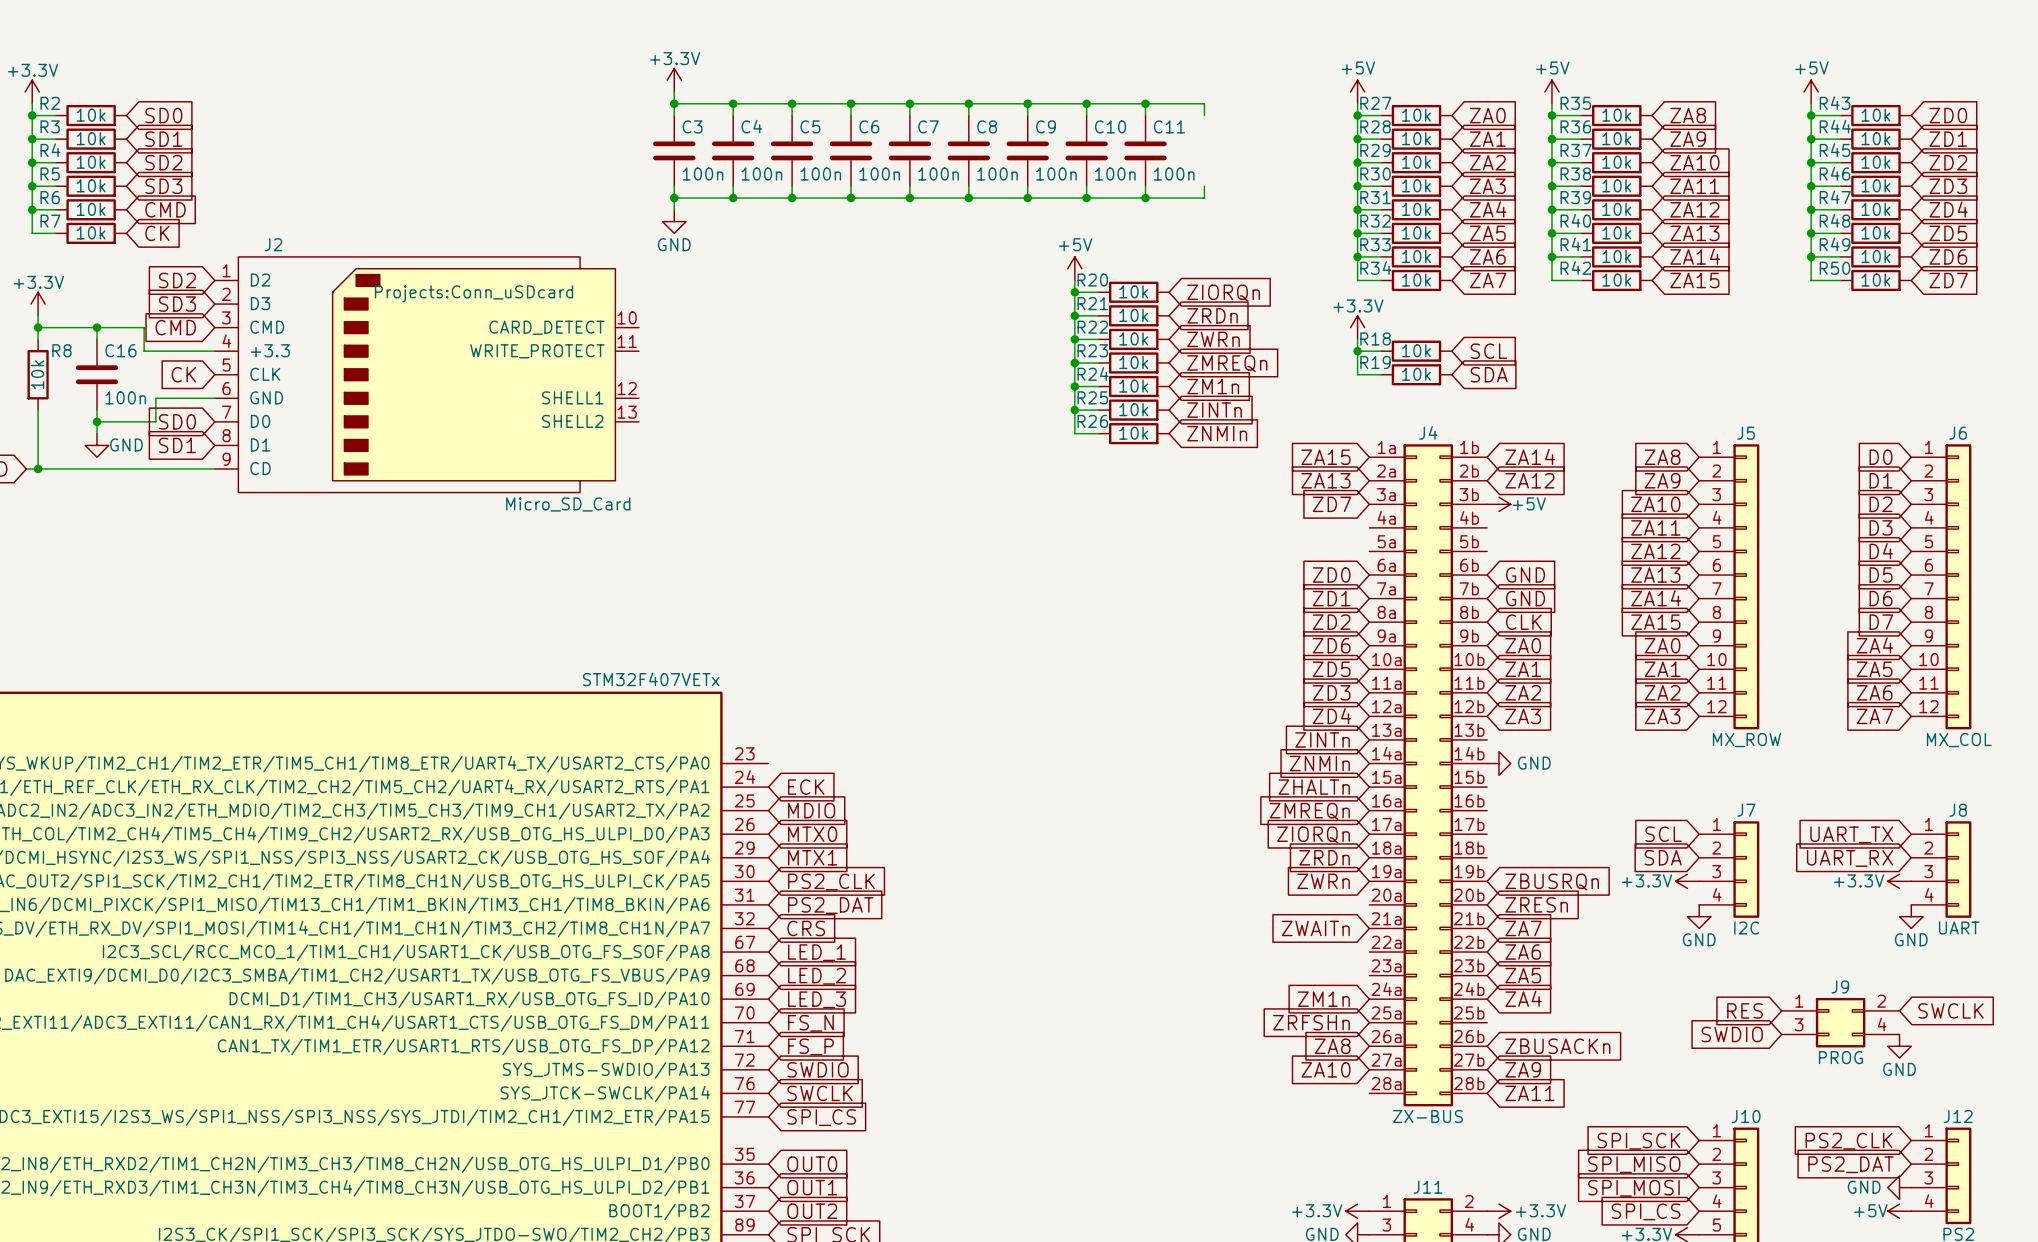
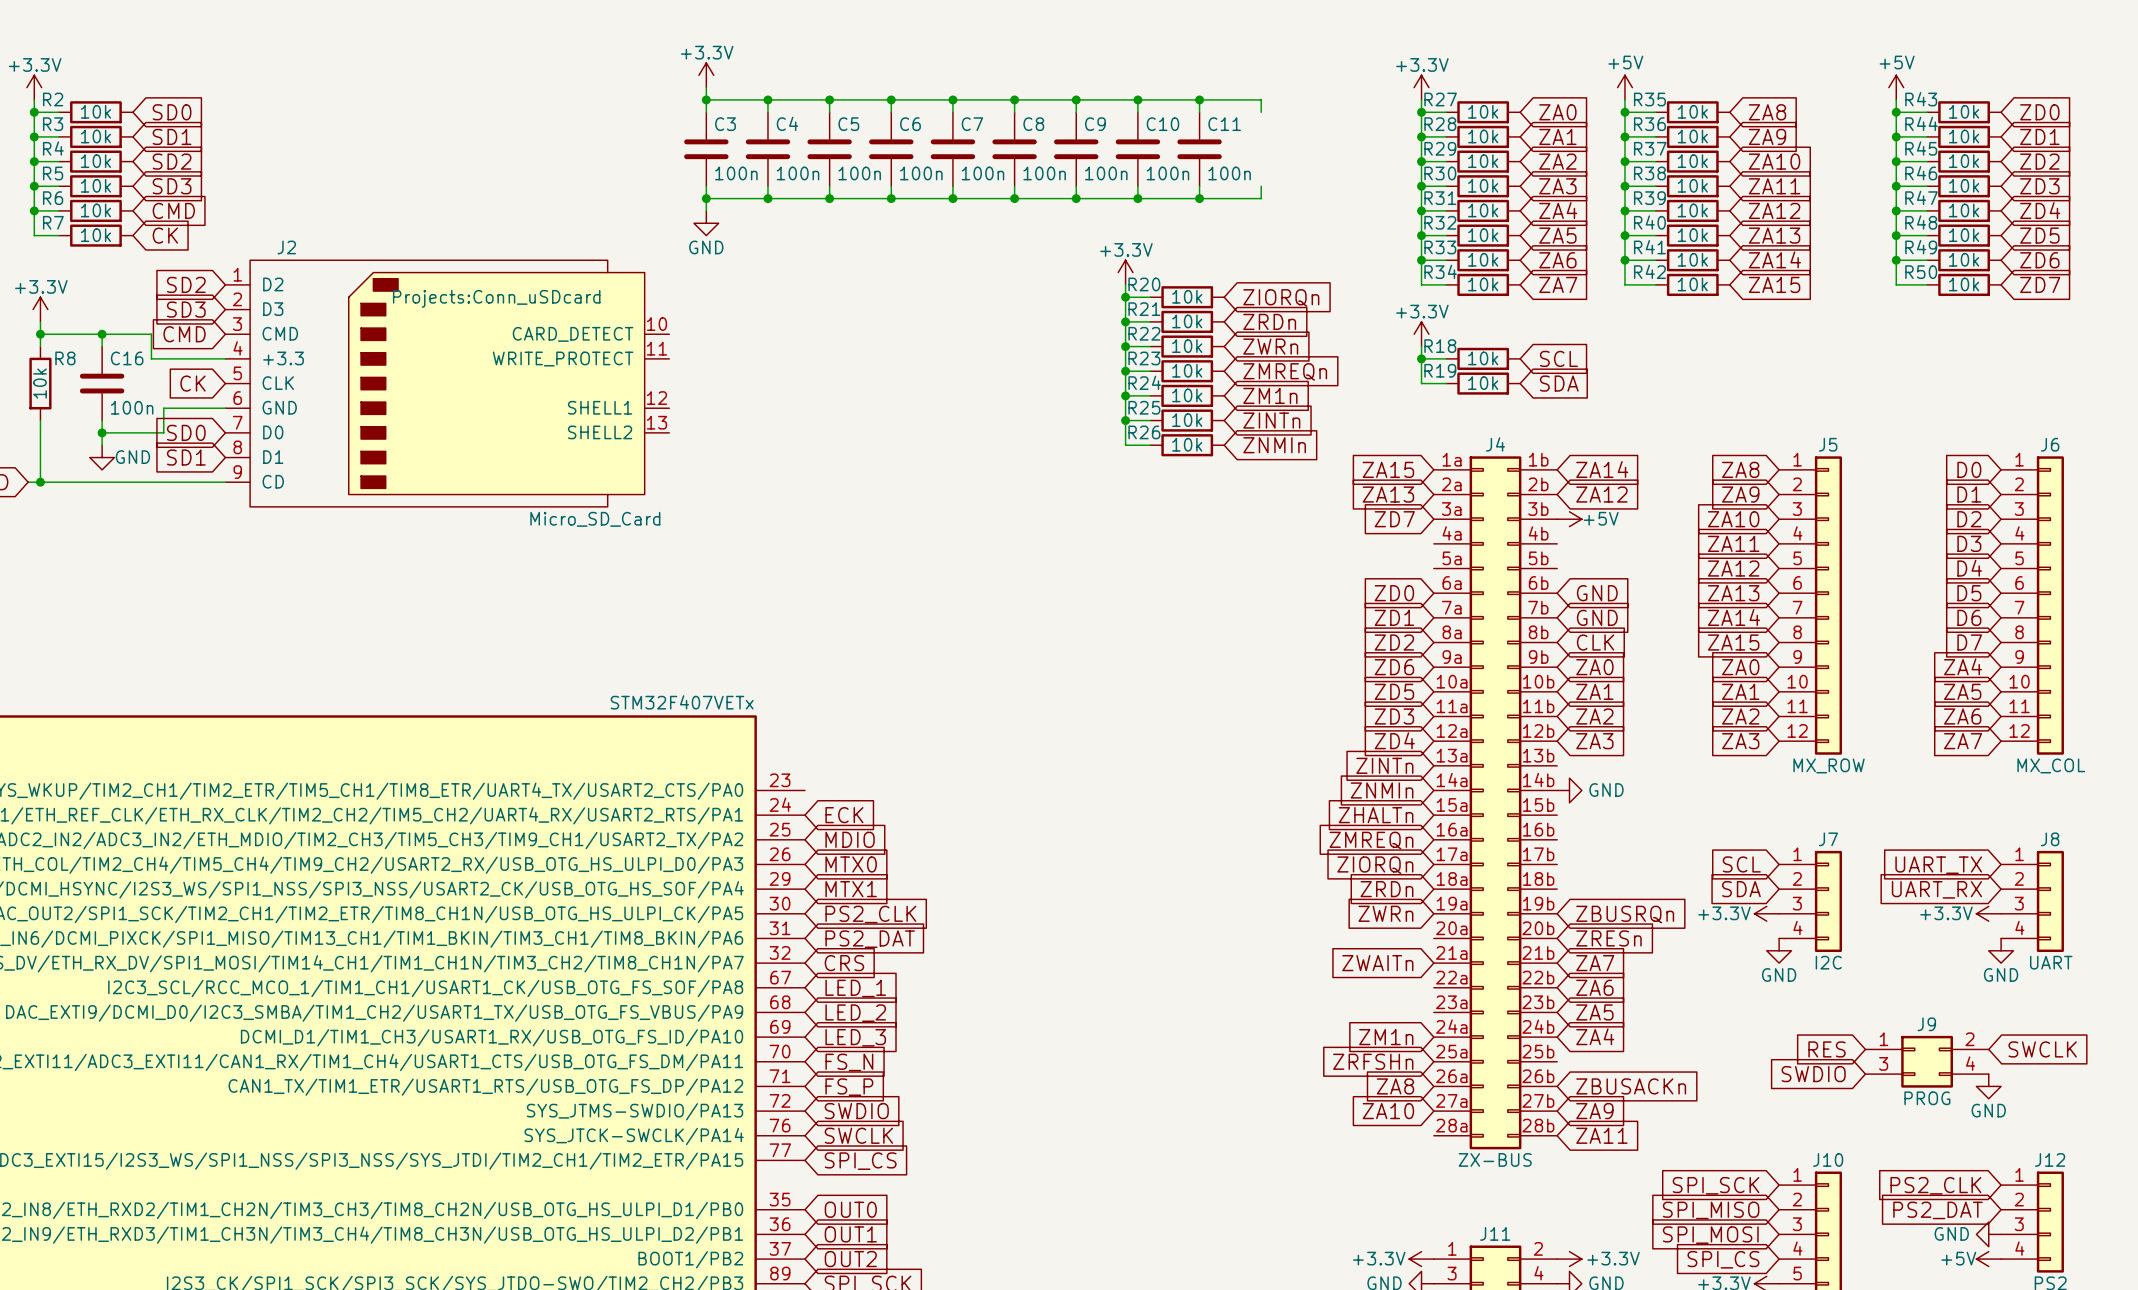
power symbol: +5V (1357, 92) -> +3.3V (1421, 87)
power symbol: +5V (1074, 268) -> +3.3V (1125, 272)

